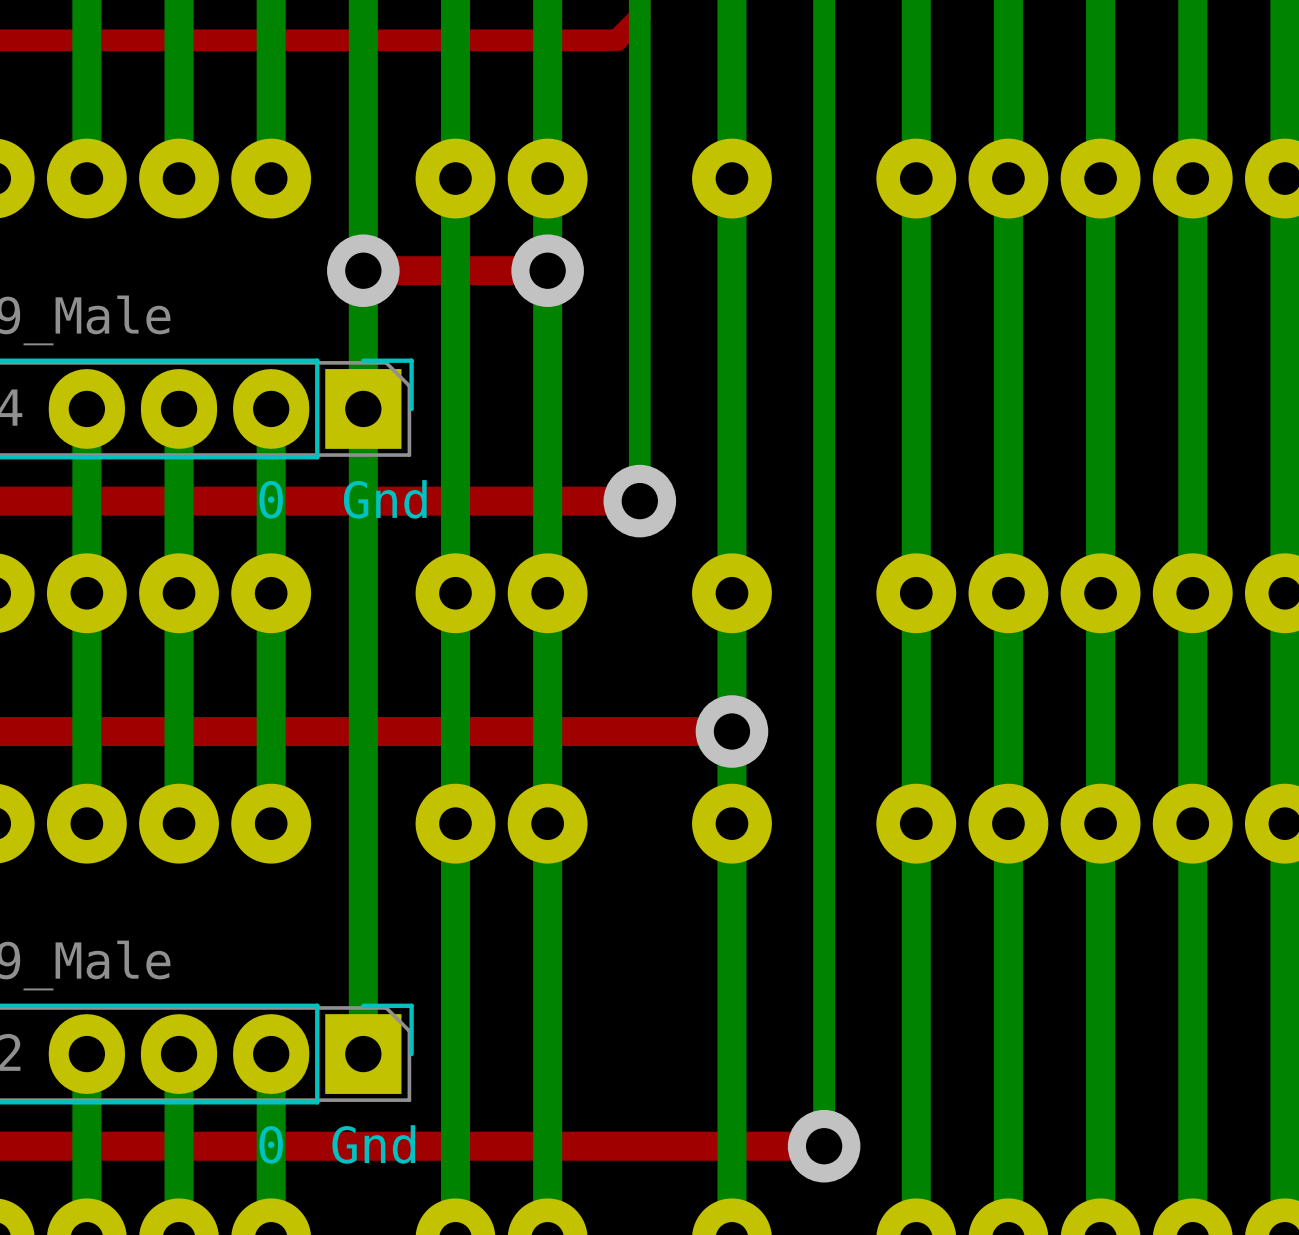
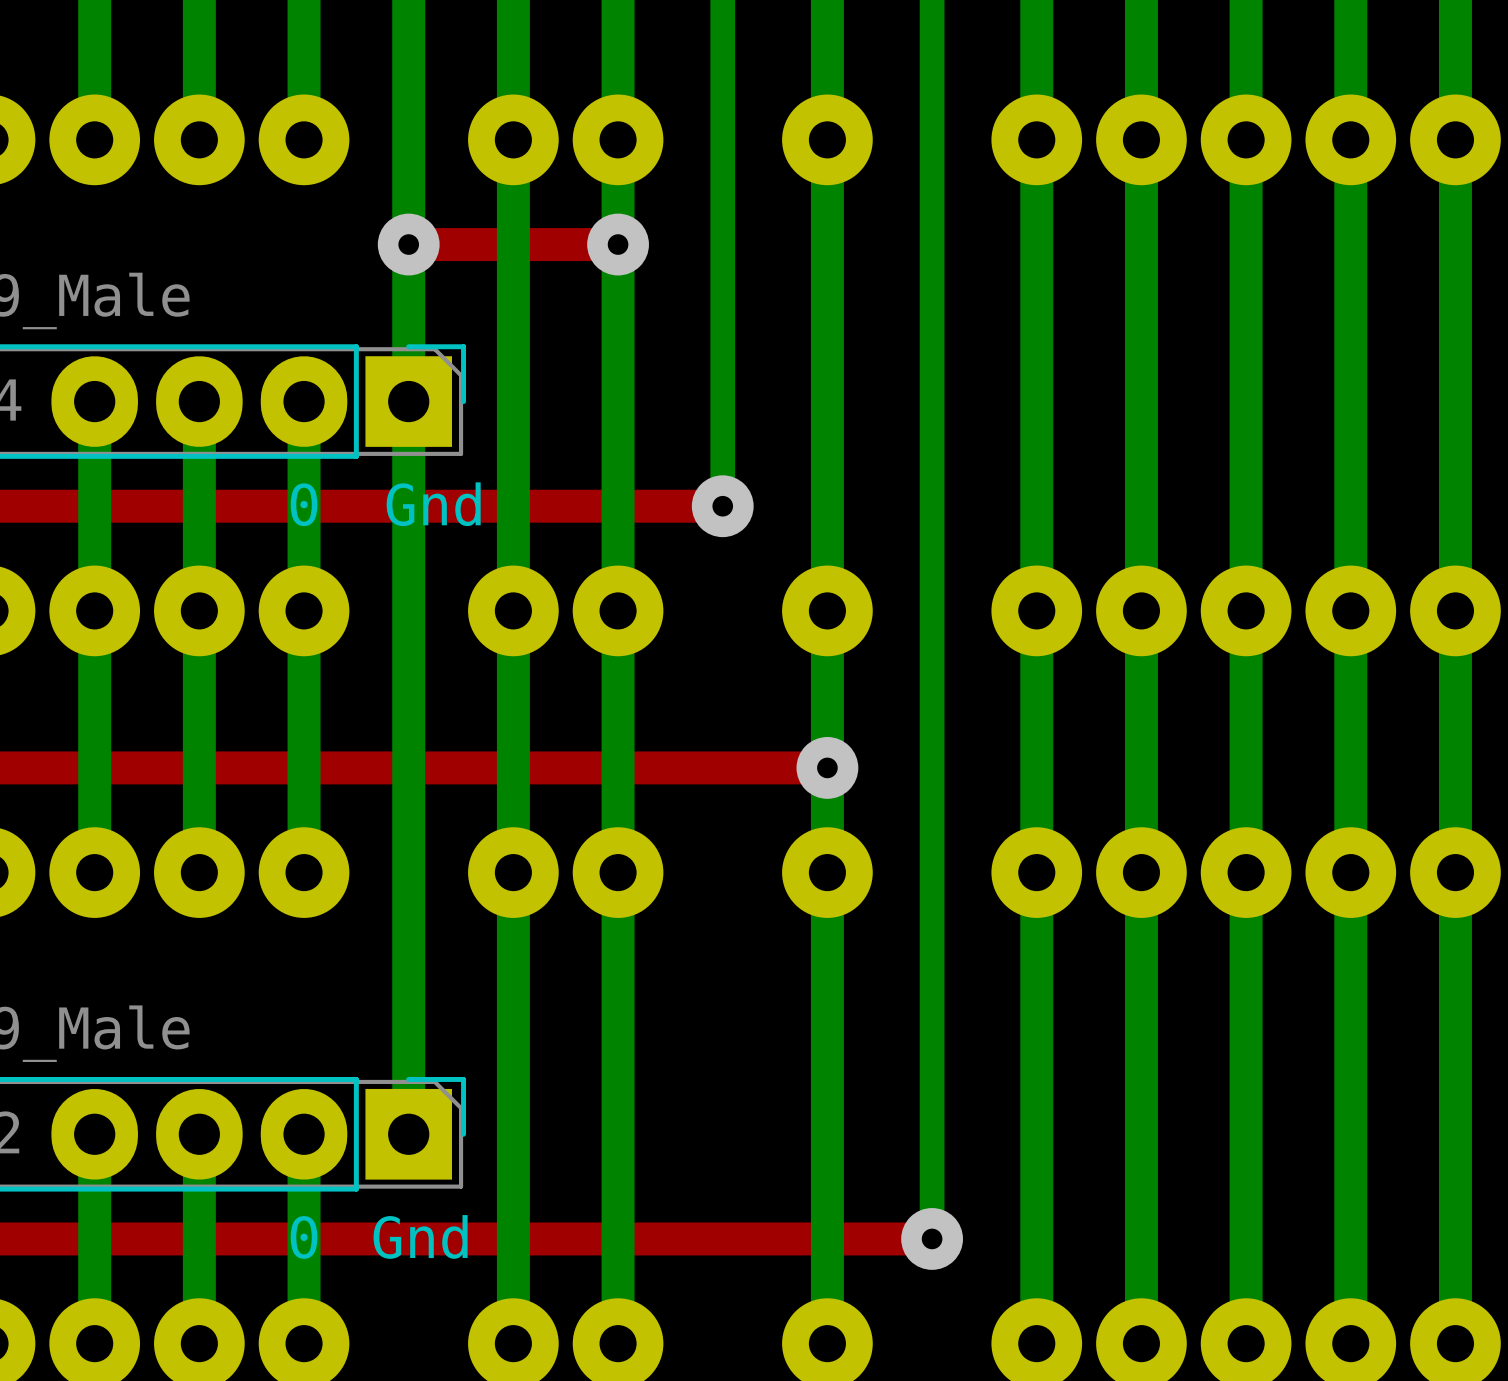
via size: [327, 234, 400, 308] -> [377, 213, 440, 276]
via size: [511, 234, 584, 308] -> [587, 213, 649, 276]
via size: [603, 464, 677, 538] -> [691, 475, 754, 538]
via size: [695, 695, 769, 768] -> [796, 737, 859, 799]
via size: [787, 1109, 861, 1183] -> [901, 1208, 964, 1270]

